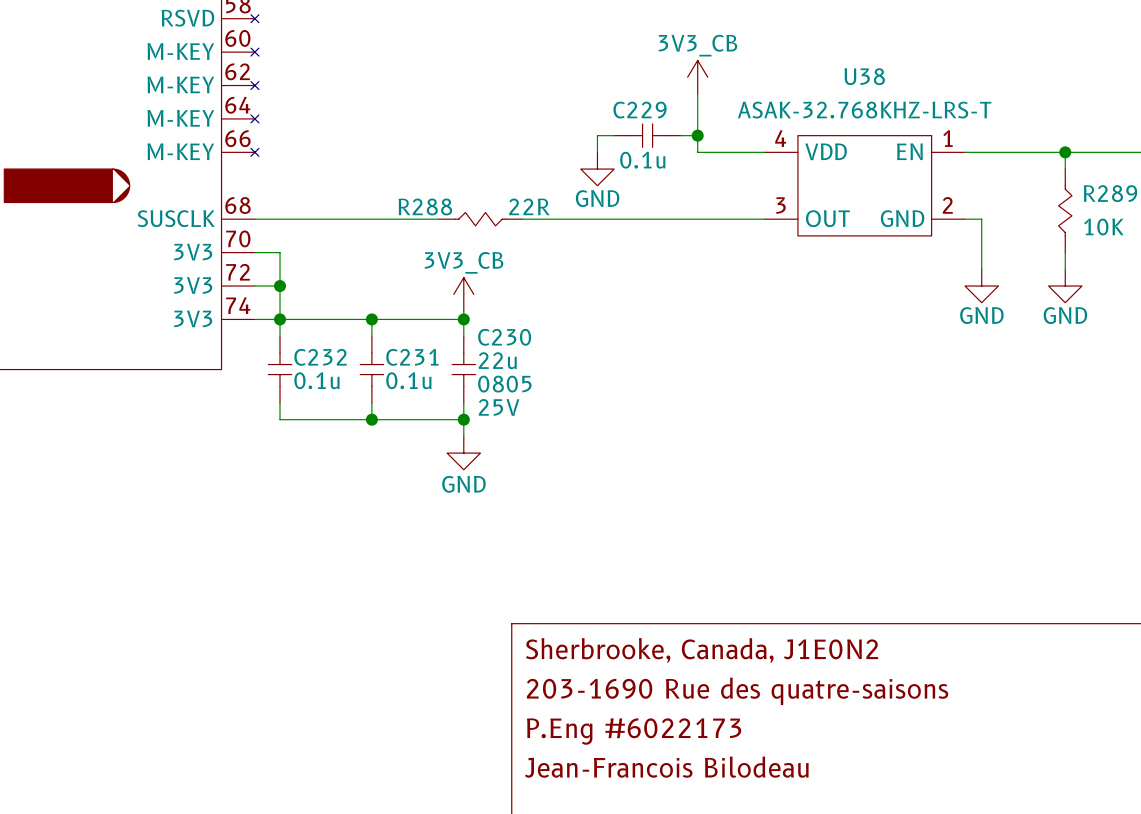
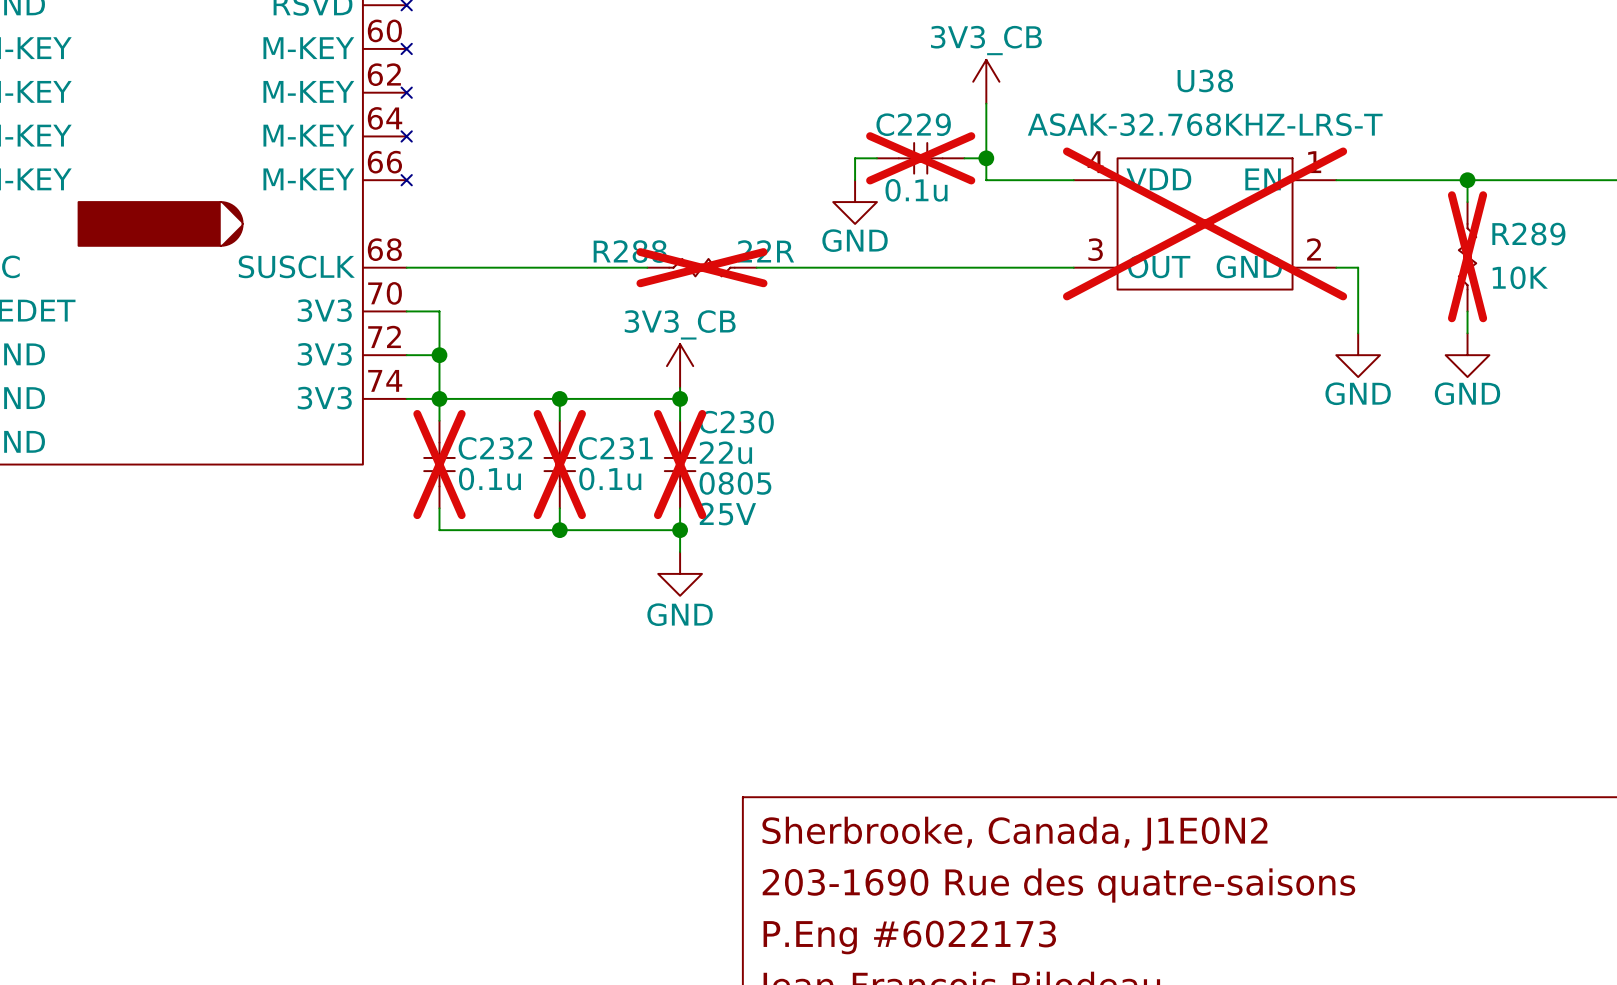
C229 do-not-place cross: none -> (920, 158)
U38 do-not-place cross: none -> (1205, 223)
R289 do-not-place cross: none -> (1467, 256)
R288 do-not-place cross: none -> (701, 267)
C232 do-not-place cross: none -> (439, 464)
C231 do-not-place cross: none -> (559, 464)
C230 do-not-place cross: none -> (680, 464)

